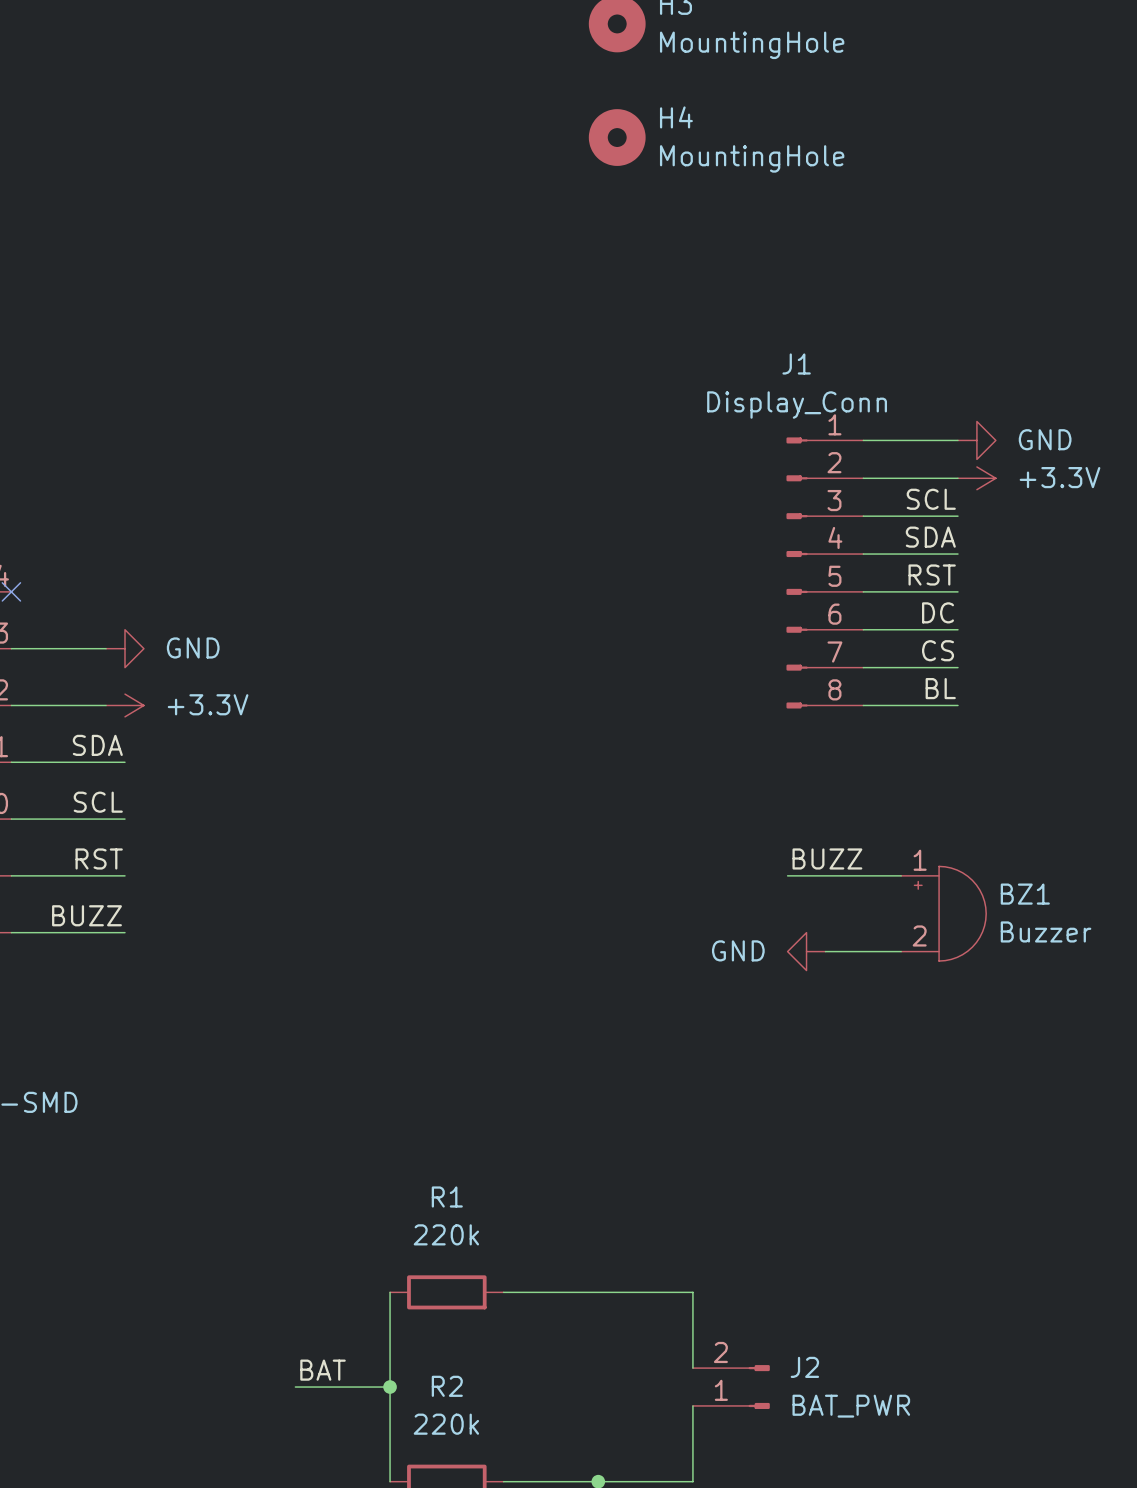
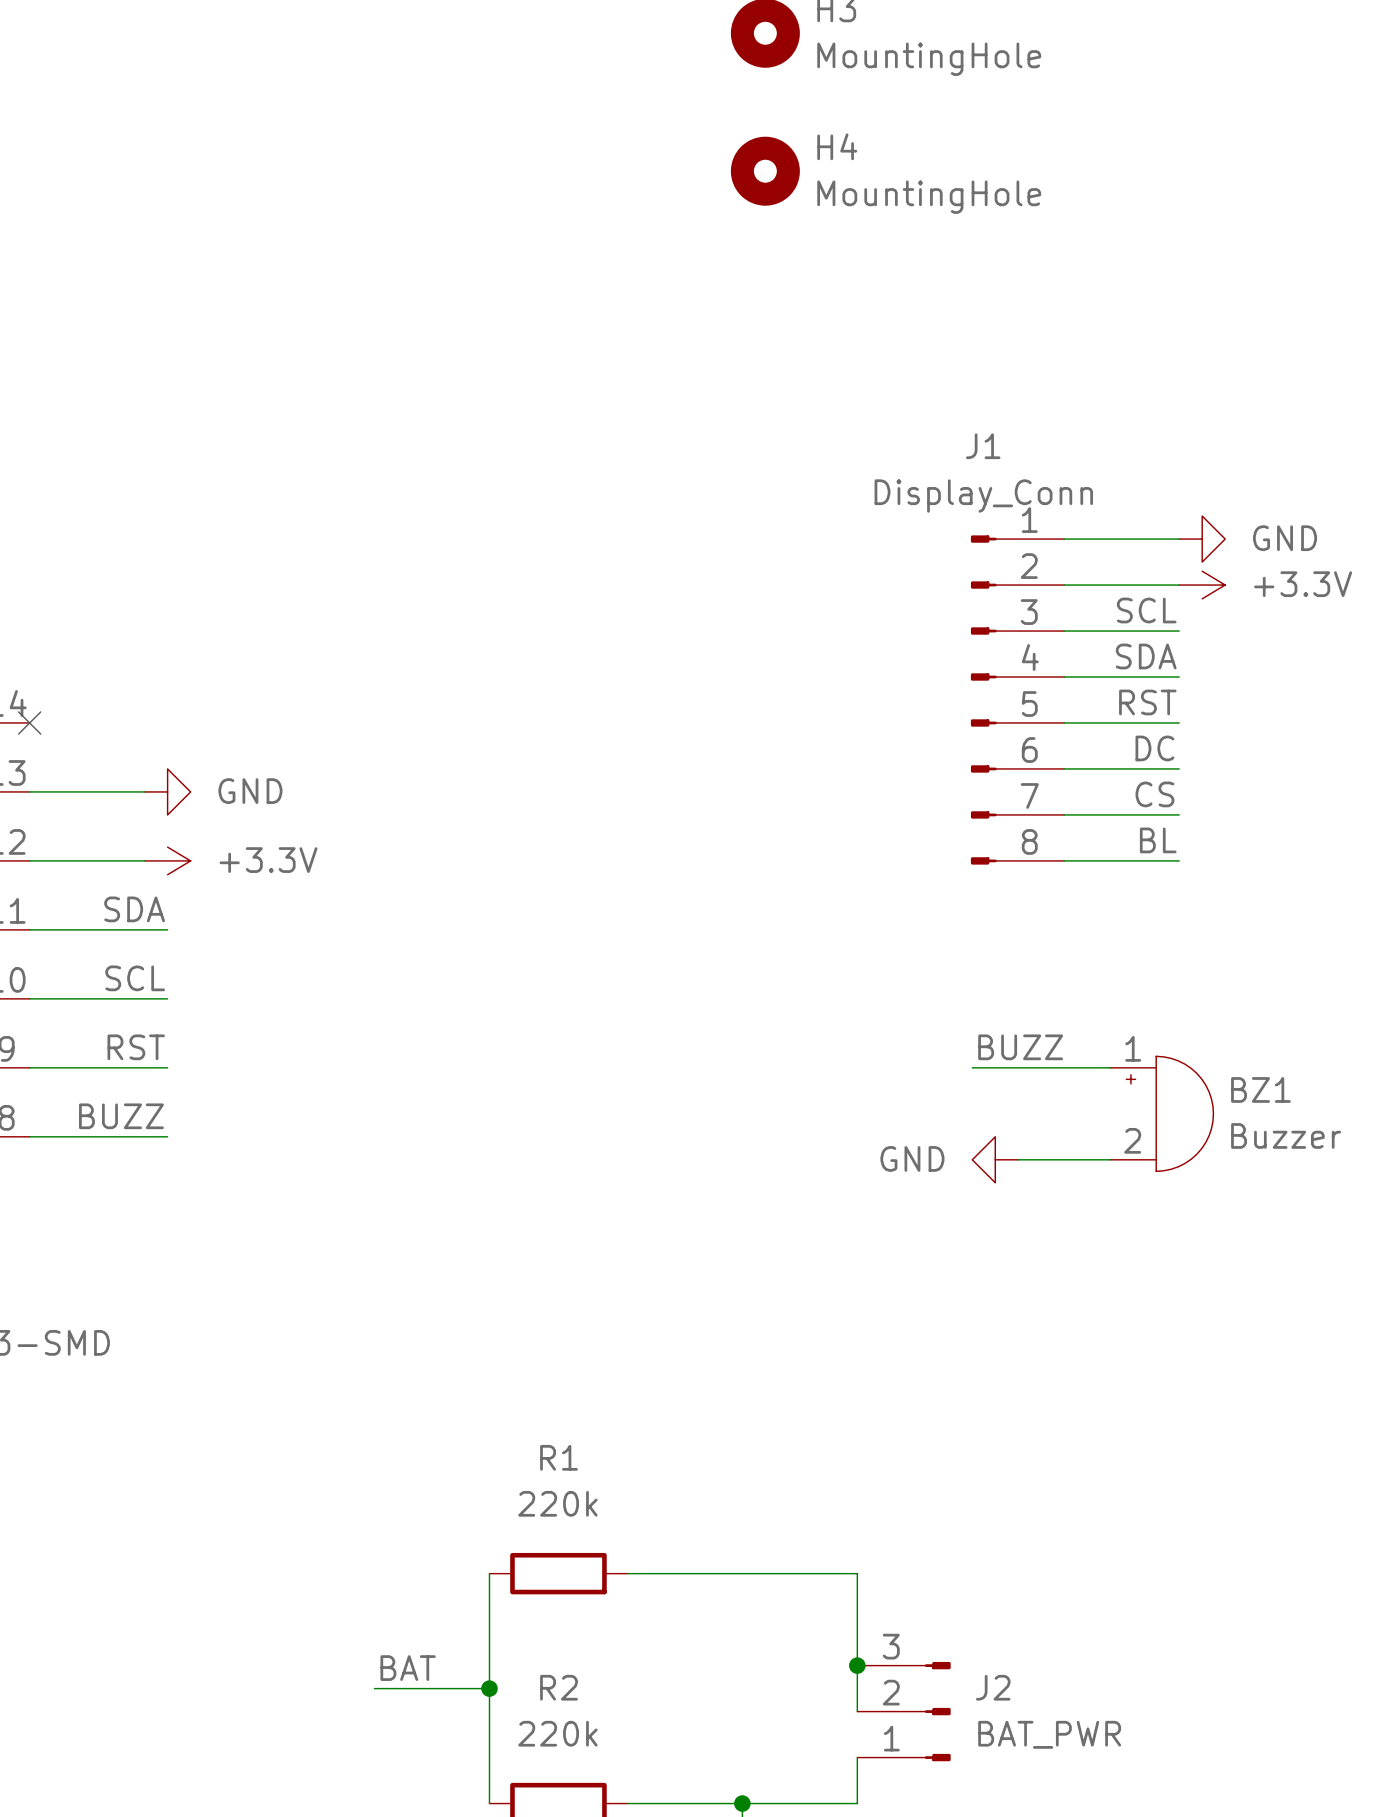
J2 symbol: [692, 1365, 770, 1409] -> [857, 1661, 951, 1762]
junction: none -> (857, 1665)
wire: (692, 1405) (692, 1443) -> (857, 1711) (857, 1665)

